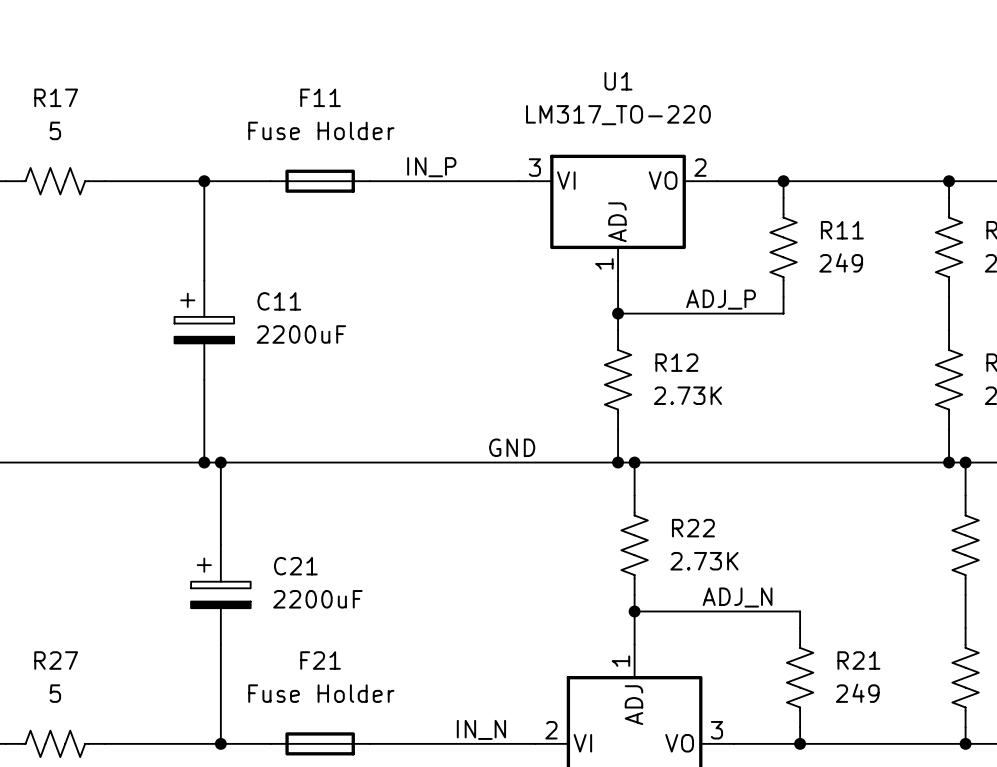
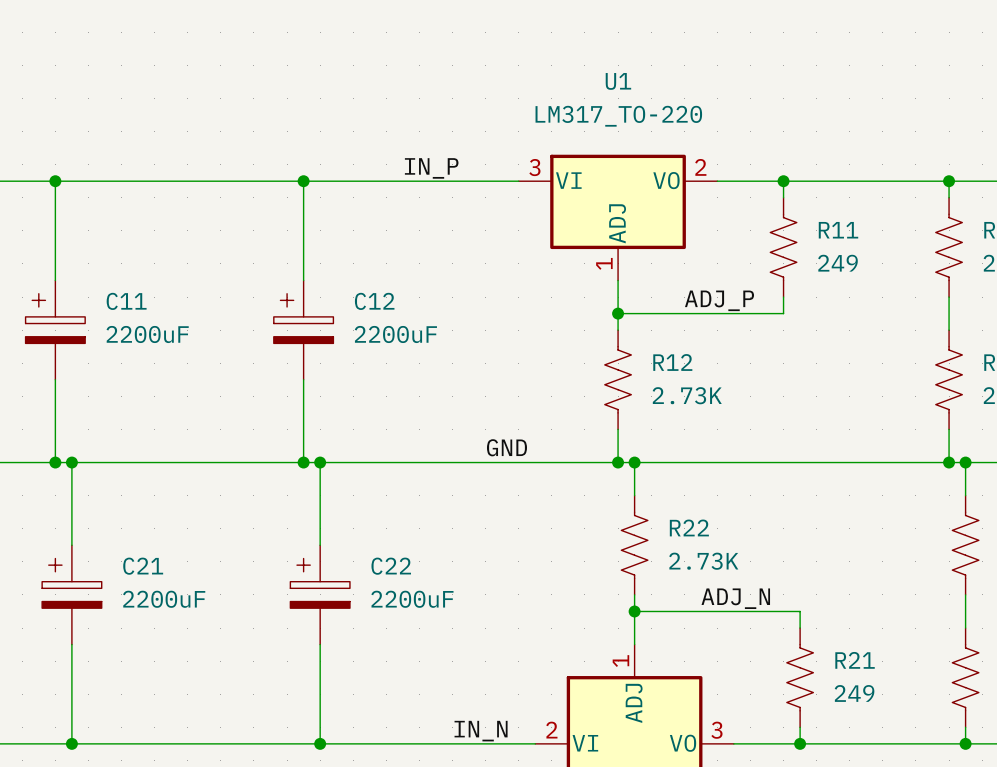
wire: none -> (5, 181) (105, 181)
wire: none -> (55, 181) (55, 280)
junction: none -> (55, 181)
R17: 5 (55, 181) -> none
wire: (204, 181) (204, 280) -> (303, 181) (303, 280)
junction: (204, 181) -> none
junction: none -> (303, 181)
F11: Fuse Holder (320, 181) -> none
C11 position: (204, 330) -> (55, 330)
C12: none -> 2200uF (303, 330)
wire: none -> (55, 379) (55, 462)
wire: (204, 379) (204, 462) -> (303, 379) (303, 462)
junction: none -> (55, 462)
wire: none -> (71, 462) (71, 545)
junction: none -> (71, 462)
junction: (204, 462) -> none
wire: (220, 462) (220, 545) -> (320, 462) (320, 545)
junction: (220, 462) -> none
junction: none -> (303, 462)
junction: none -> (320, 462)
C21 position: (220, 594) -> (71, 594)
C22: none -> 2200uF (320, 594)
wire: none -> (71, 644) (71, 743)
wire: (220, 644) (220, 743) -> (320, 644) (320, 743)
wire: none -> (5, 743) (105, 743)
R27: 5 (55, 743) -> none
junction: none -> (71, 743)
junction: (220, 743) -> none
junction: none -> (320, 743)
F21: Fuse Holder (320, 743) -> none

